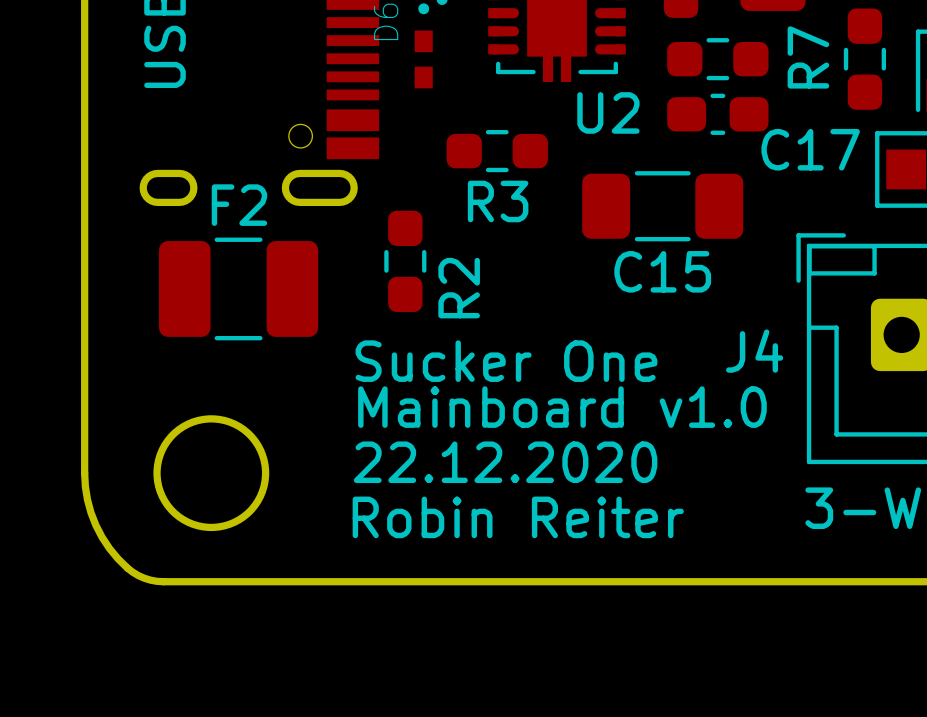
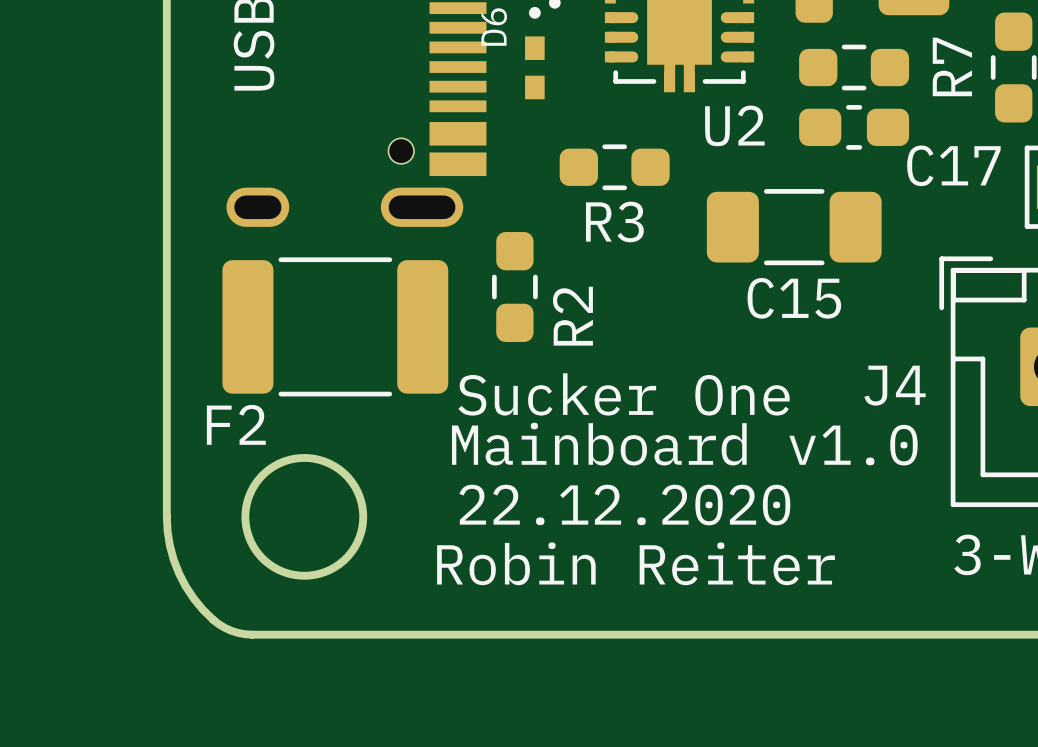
F2 name position: F2 (239, 205) -> F2 (236, 424)
F2 footprint: [158, 237, 319, 341] -> [222, 257, 449, 397]

